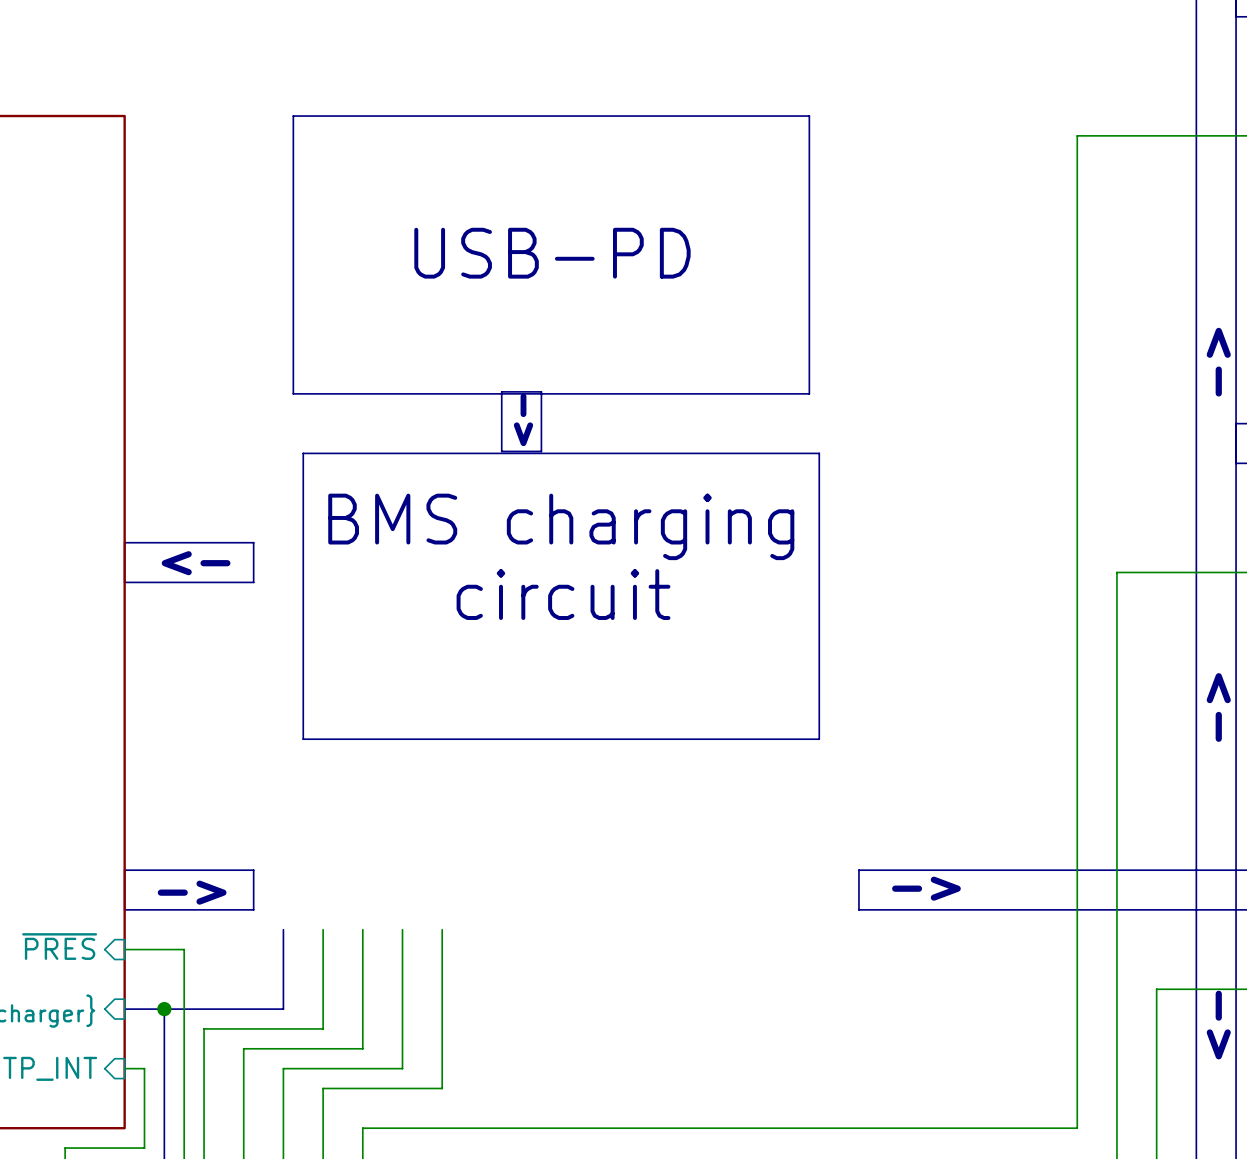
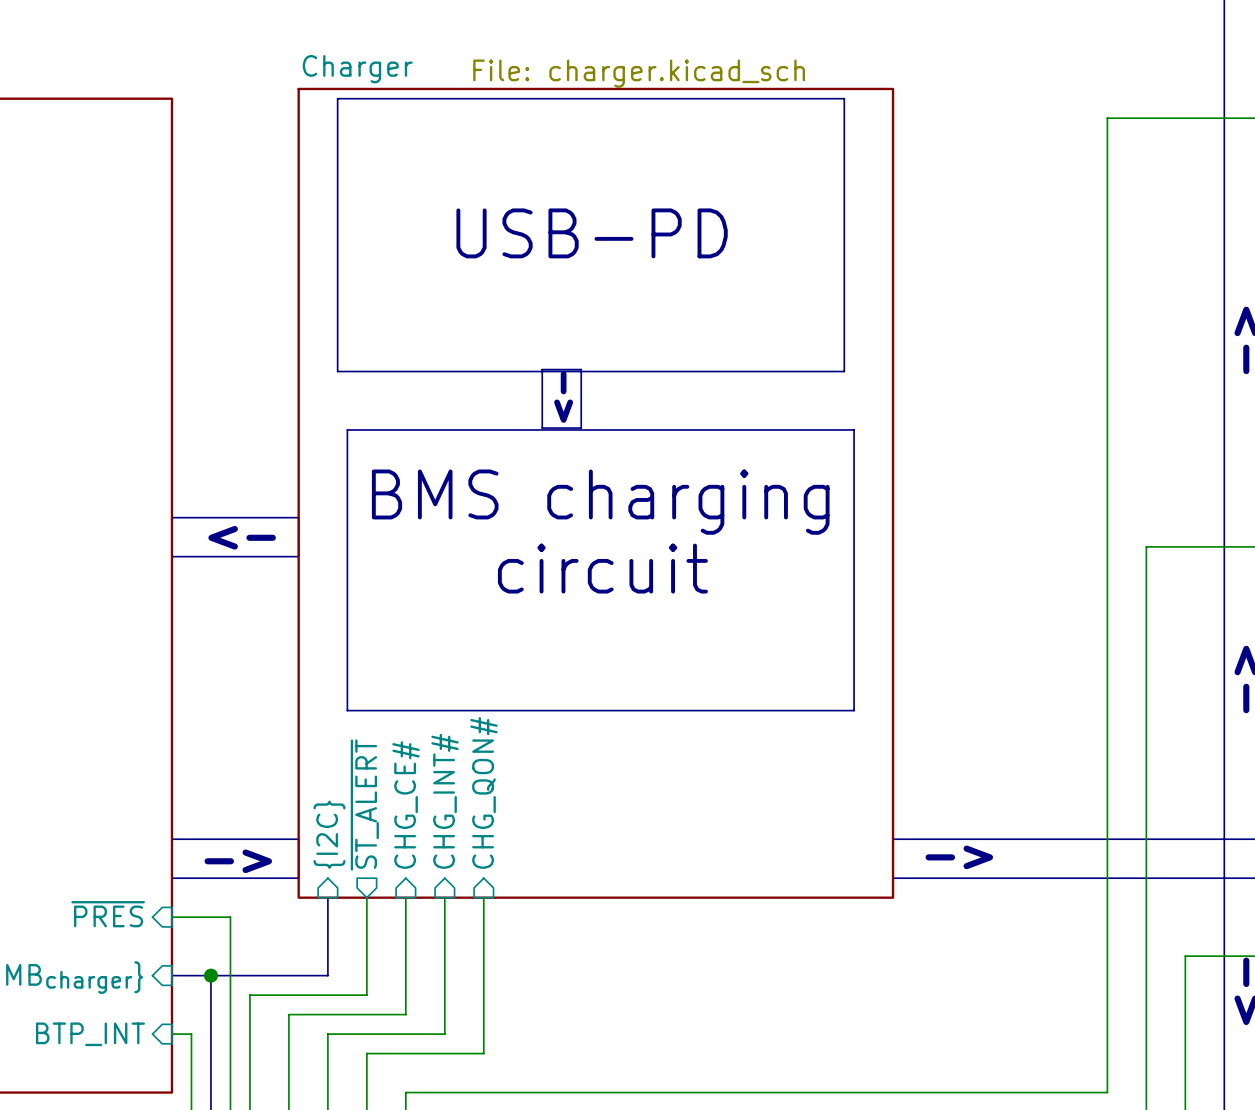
sheet Charger: none -> File: charger.kicad_sch (595, 493)
sheet pin: none -> CHG_QON# (483, 792)
sheet pin: none -> CHG_INT# (445, 801)
sheet pin: none -> ~{ST_ALERT} (364, 805)
sheet pin: none -> CHG_CE# (406, 805)
sheet pin: none -> {I2C} (329, 834)

